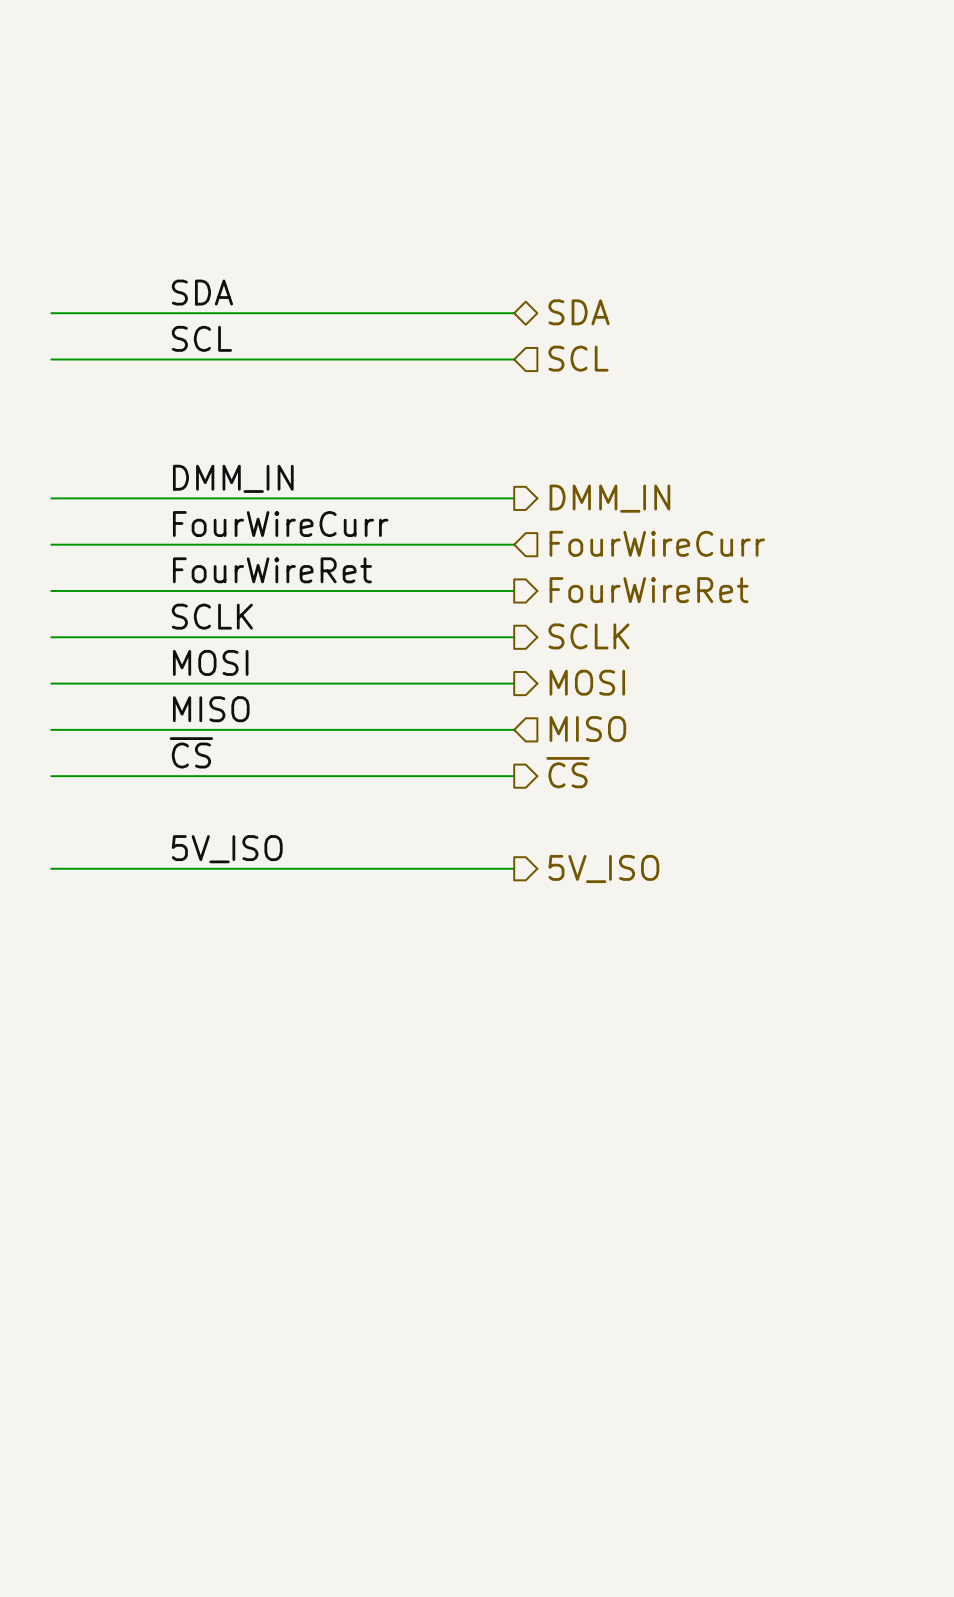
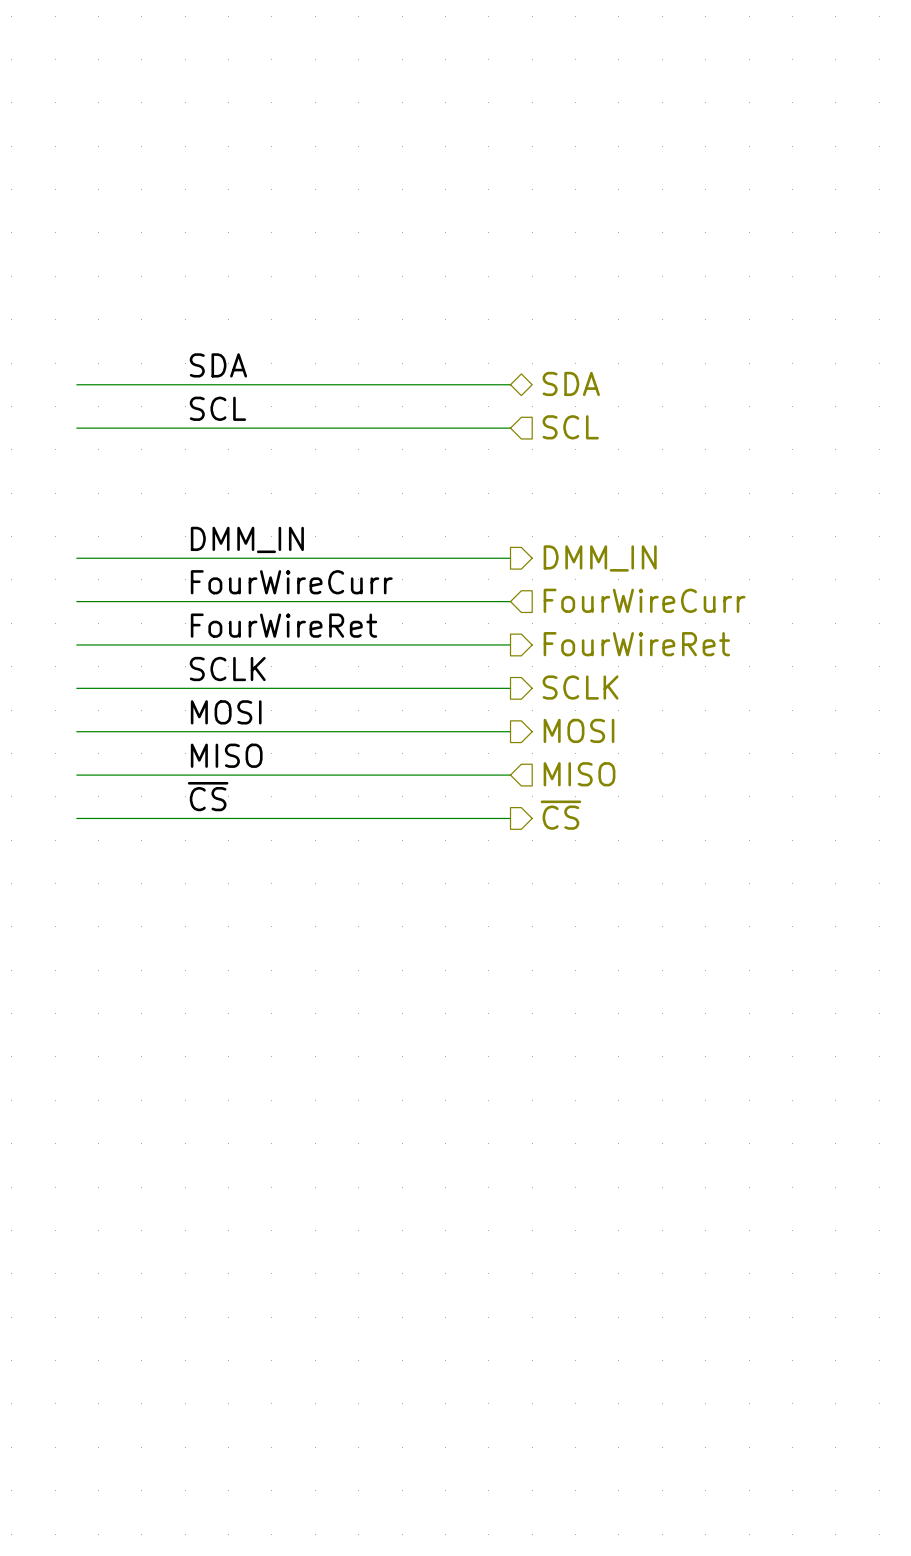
label: 5V_ISO (227, 849) -> none
wire: (51, 868) (514, 868) -> none
hierarchical label: 5V_ISO (603, 868) -> none

